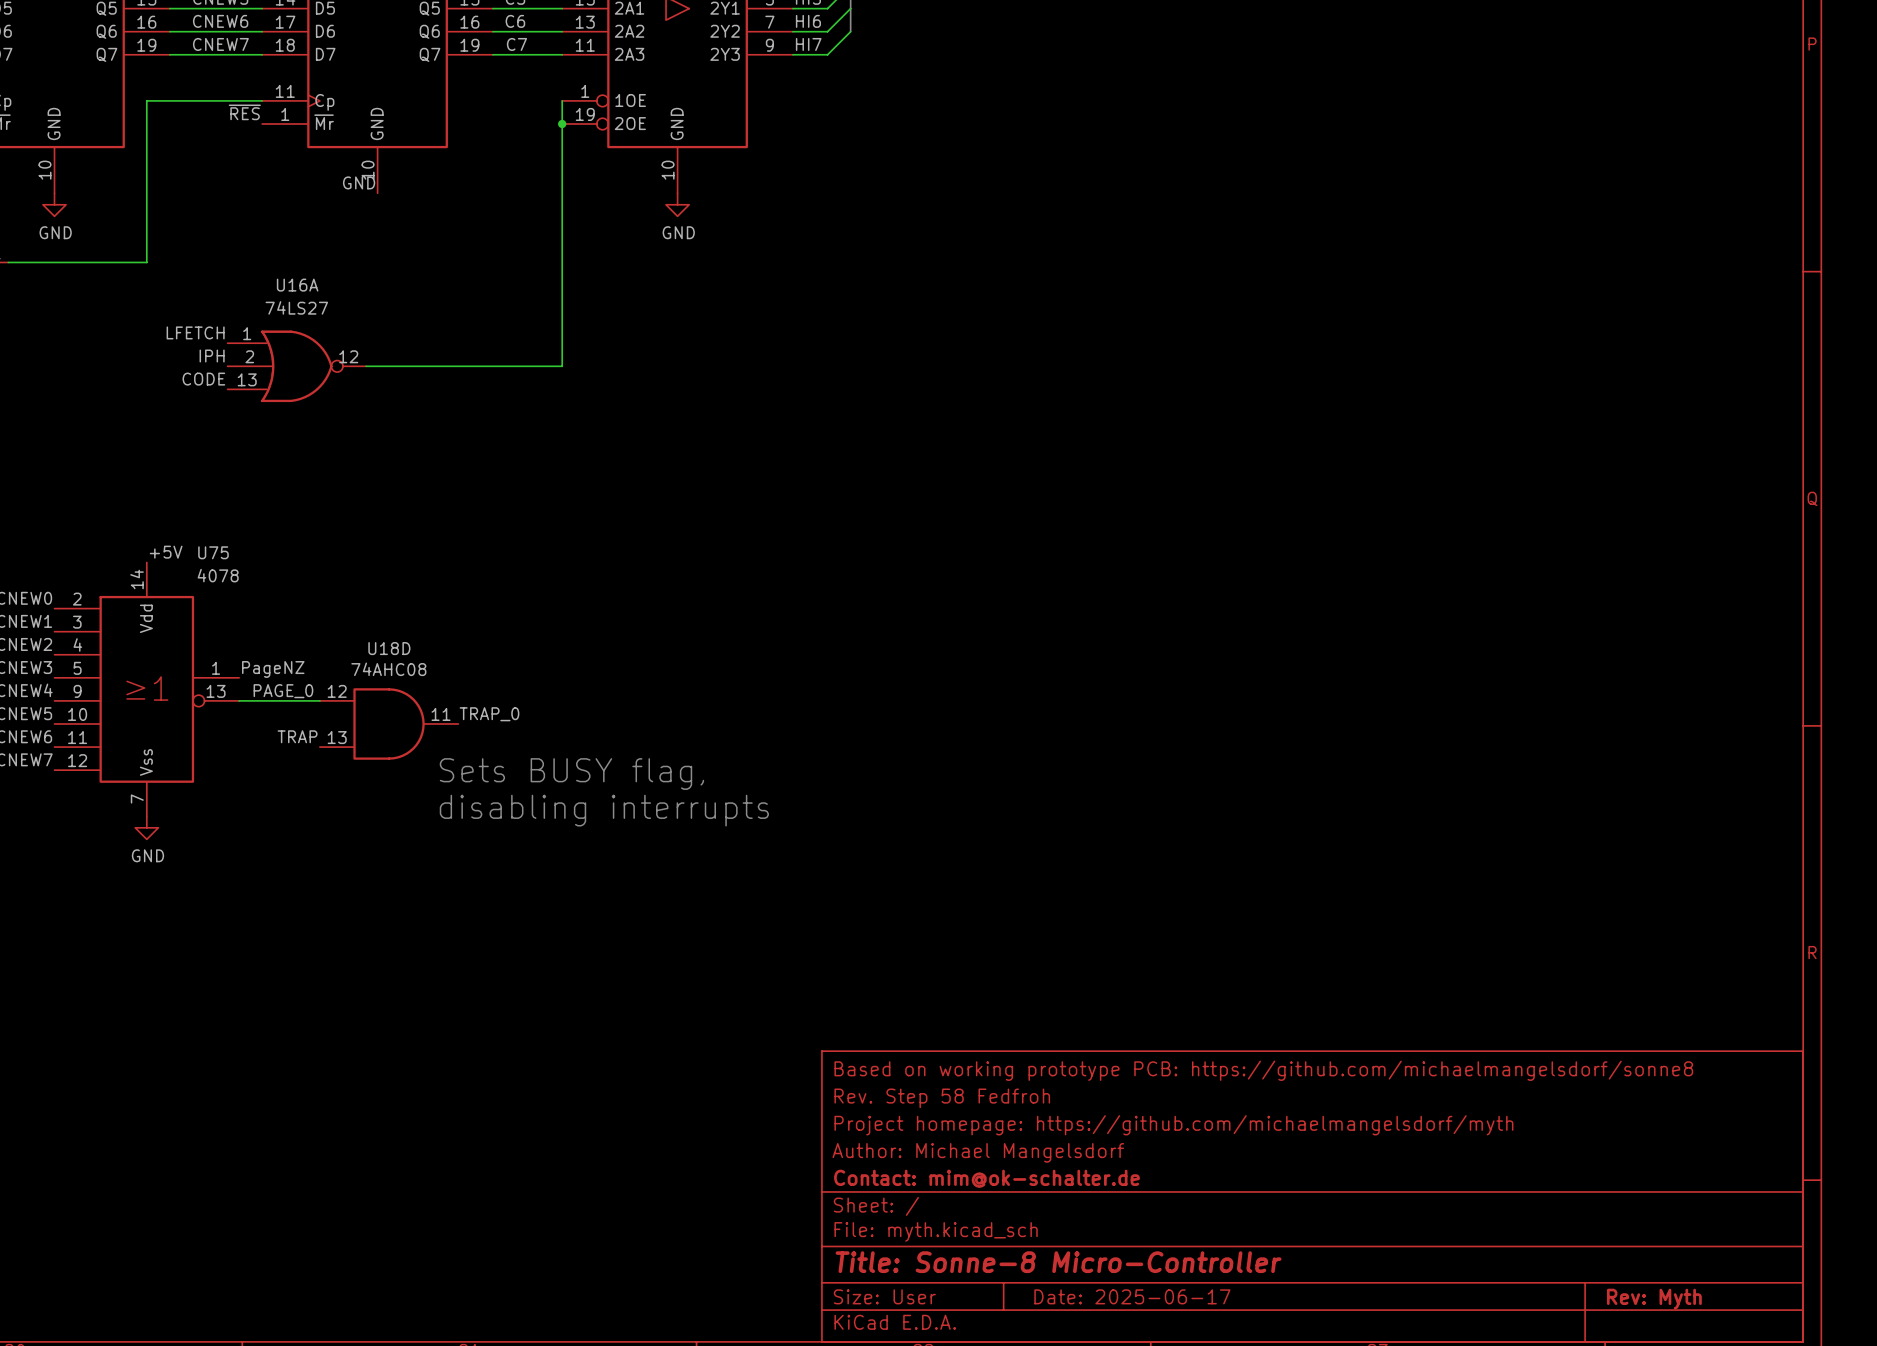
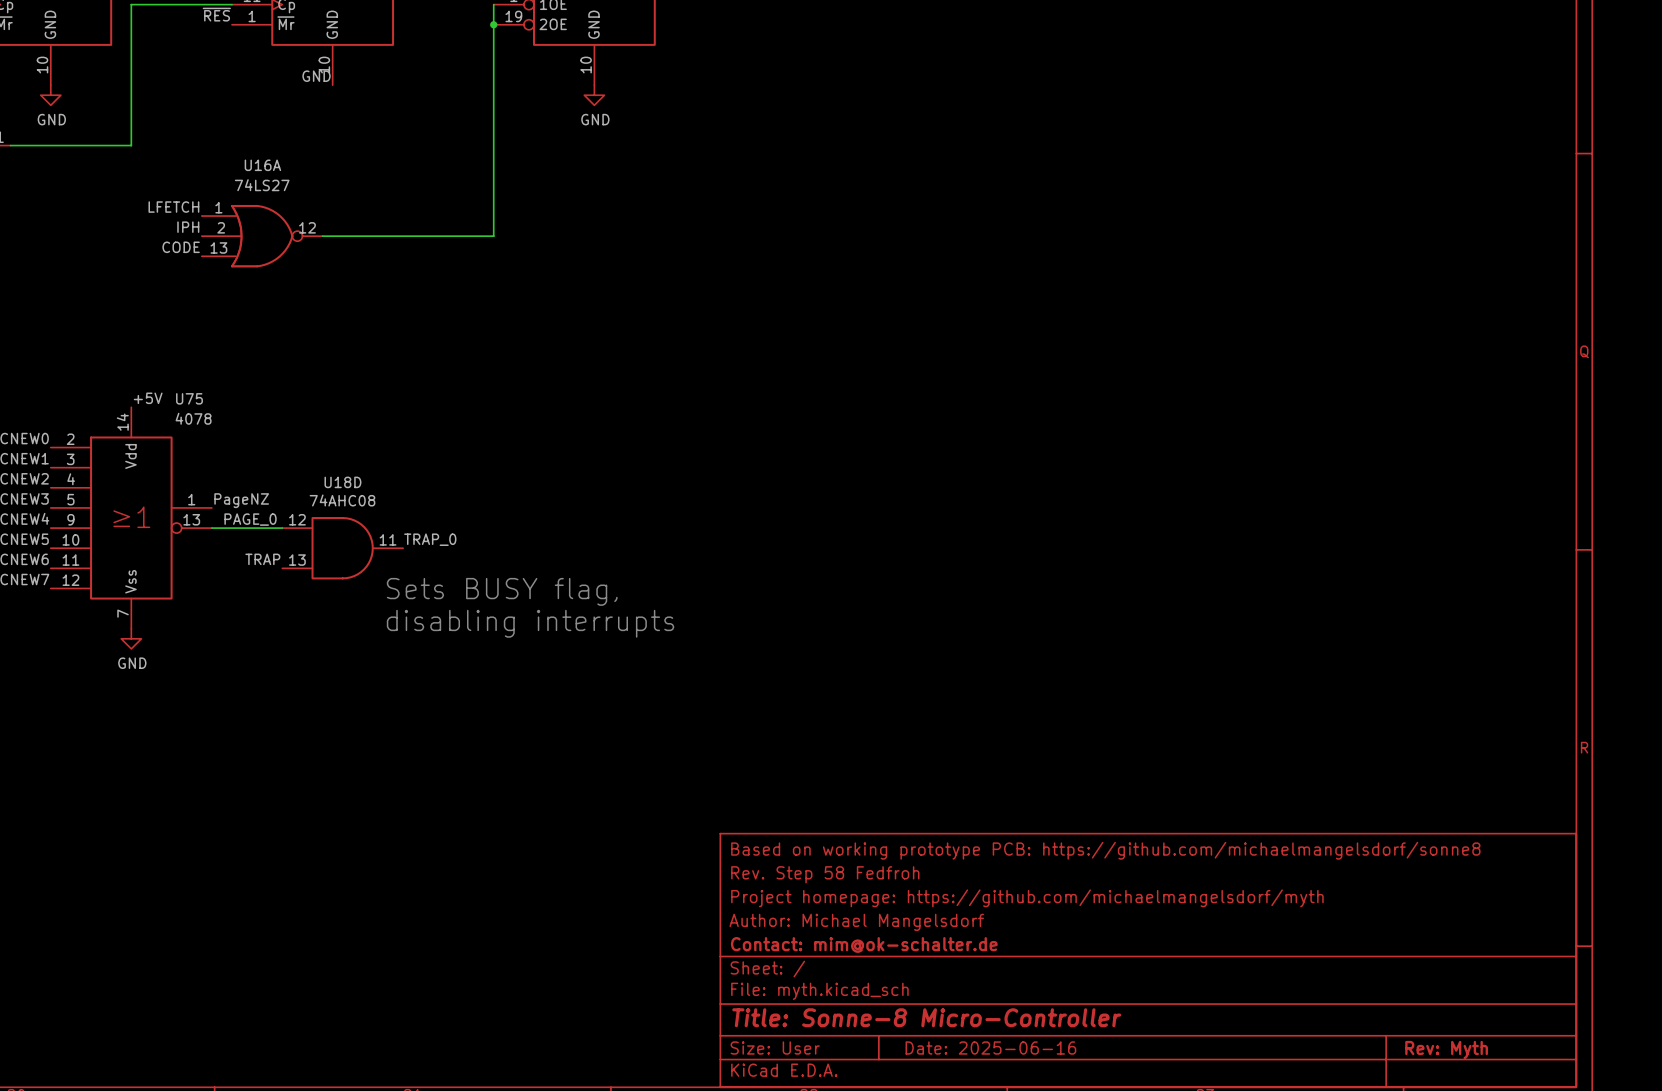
title block: Date: 2025-06-17 (1132, 1296) -> Date: 2025-06-16 (990, 1048)

